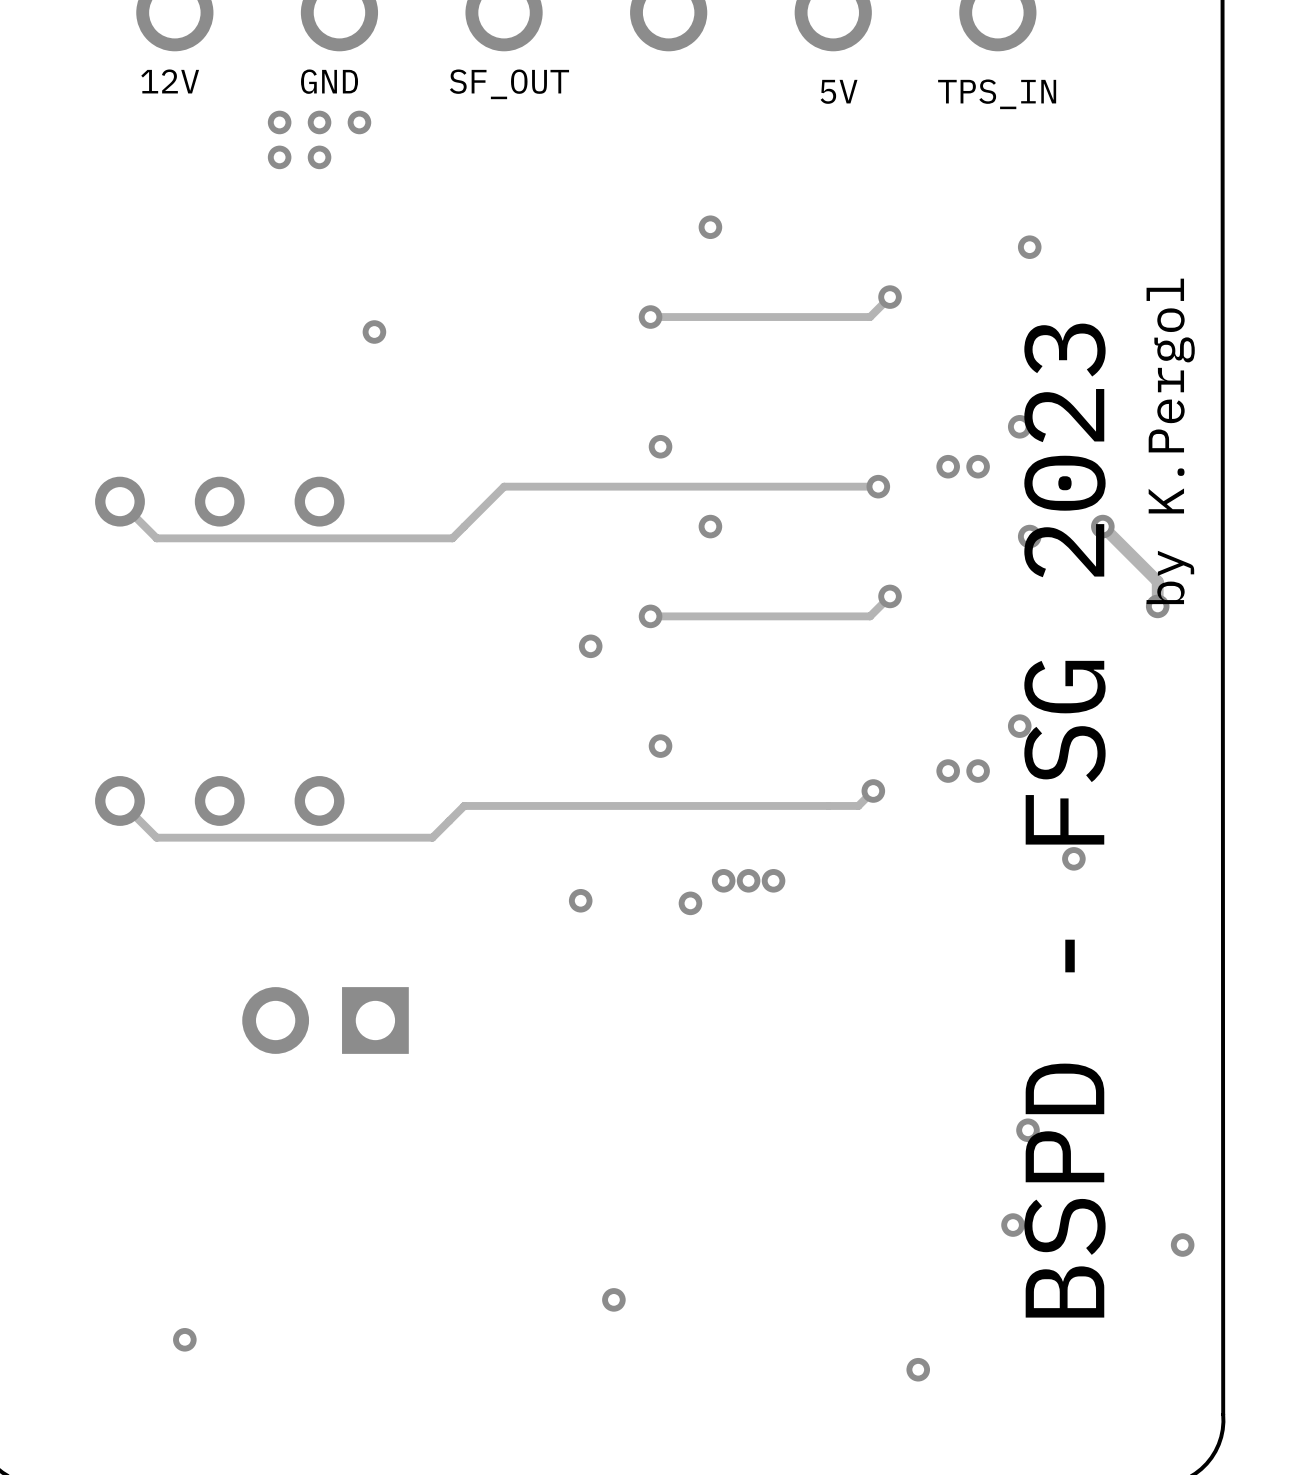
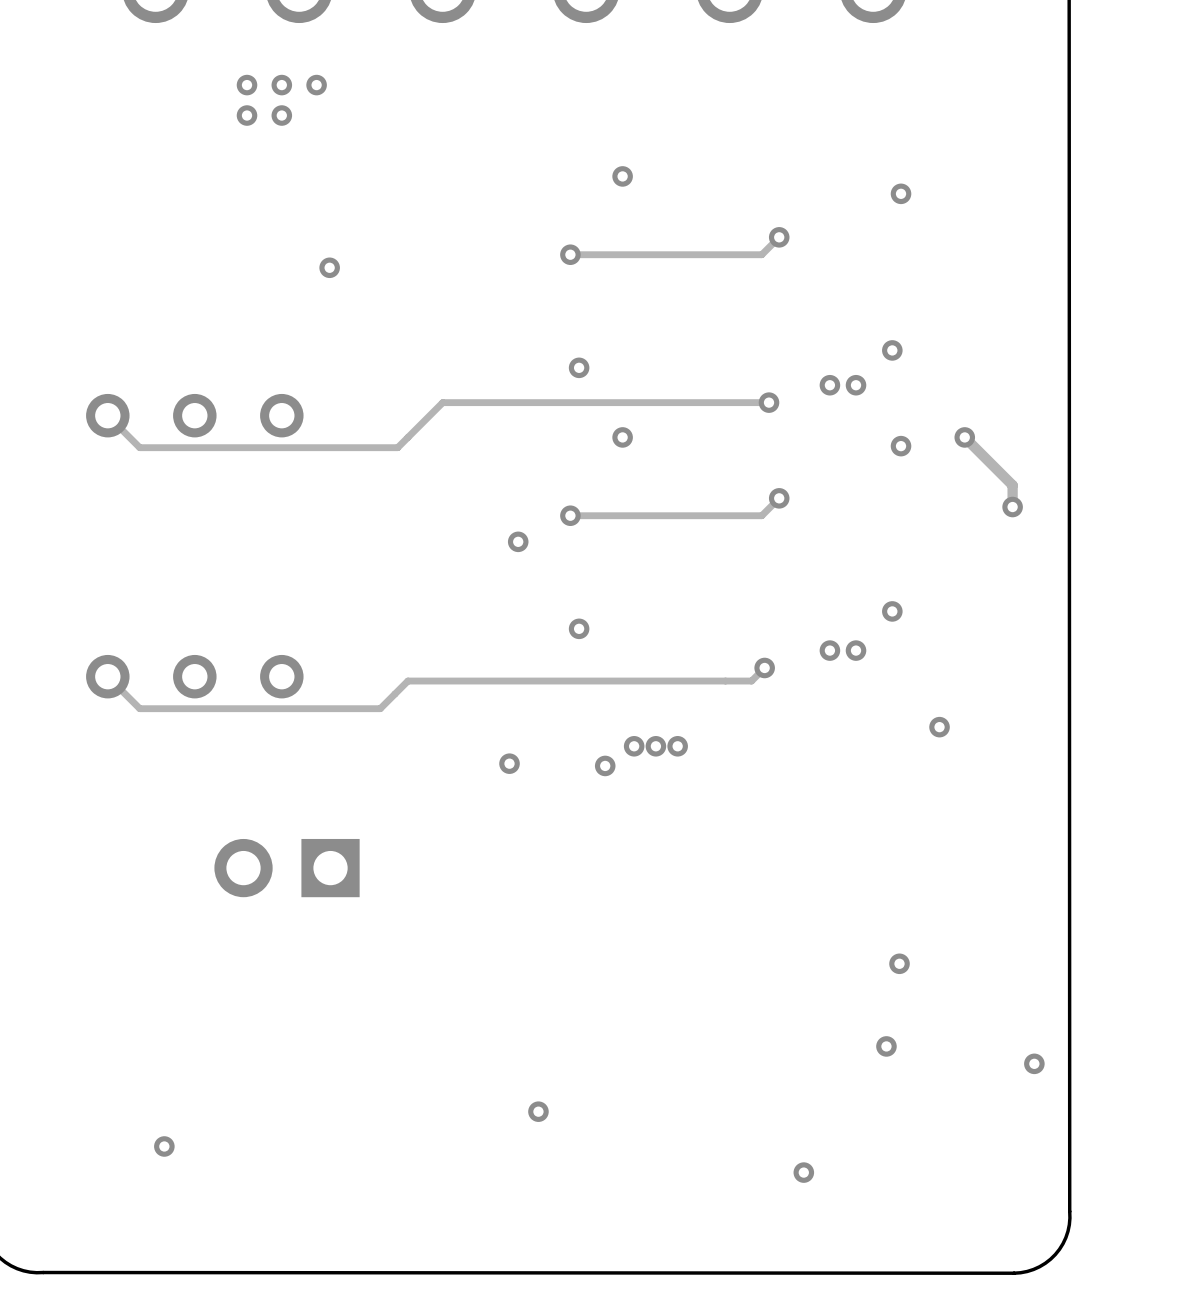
text: 12V (170, 81) -> none
text: GND (329, 81) -> none
text: SF_OUT (509, 84) -> none
text: 5V (839, 91) -> none
text: TPS_IN (997, 94) -> none
text: by K.Pergol (1170, 441) -> none
text: BSPD - FSG 2023 (1064, 820) -> none

